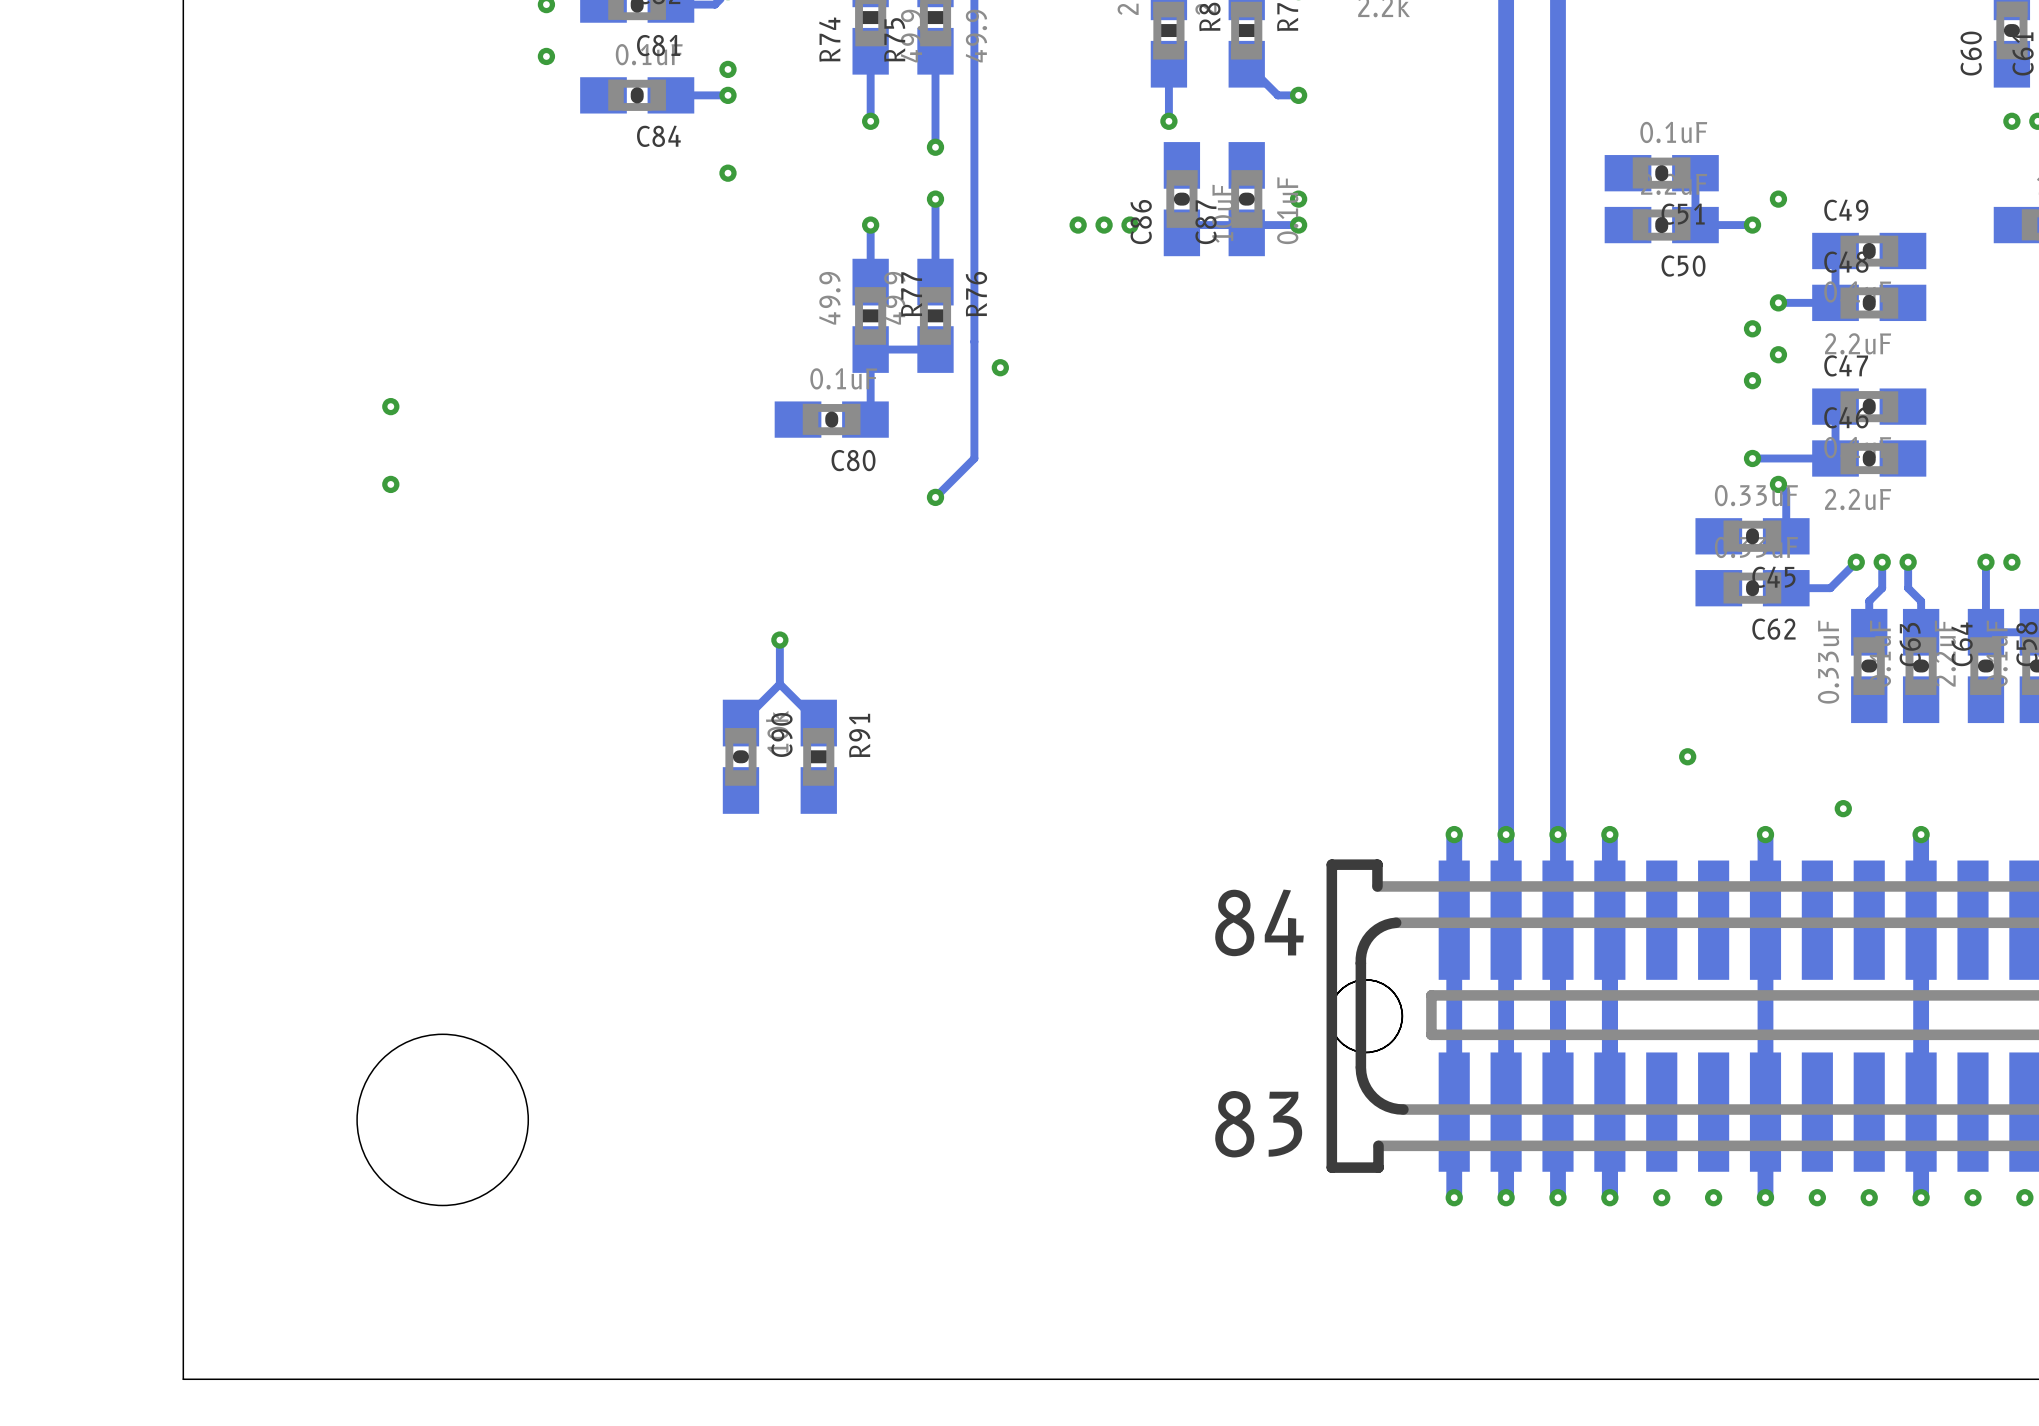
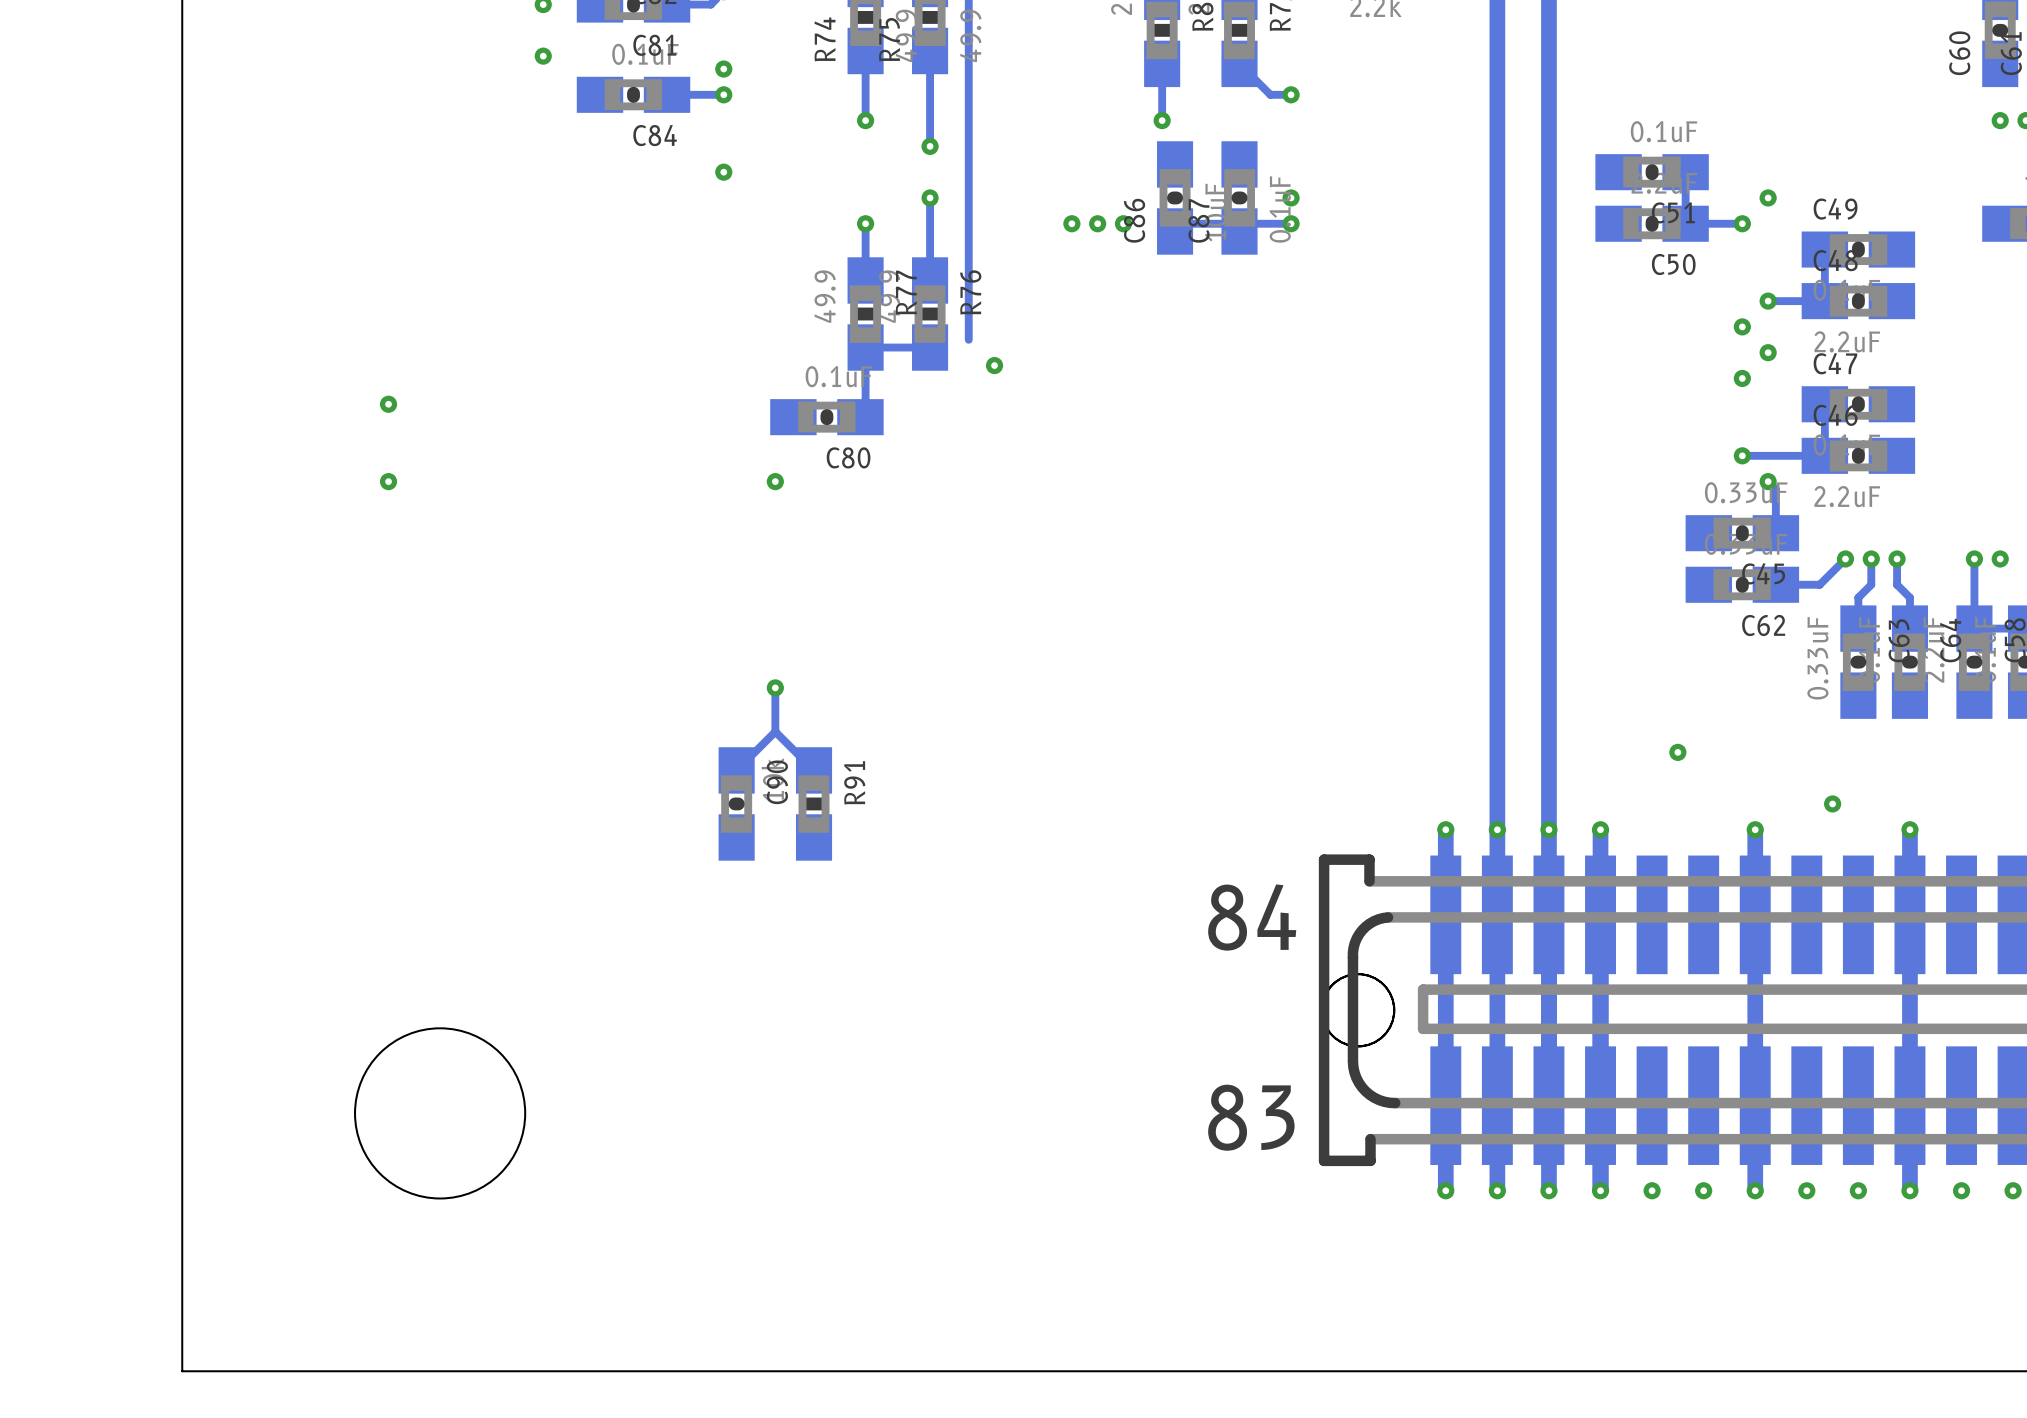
track: (974, 341) (974, 458) (935, 497) -> none
via: none -> (775, 481)
via: (935, 497) -> none
track: (779, 640) (779, 684) -> (775, 687) (775, 731)
via position: (779, 640) -> (775, 687)
track: (779, 684) (818, 723) -> (775, 731) (814, 770)
track: (779, 684) (740, 723) -> (775, 731) (736, 770)
C90 position: (740, 756) -> (736, 803)
R91 position: (818, 756) -> (814, 803)

